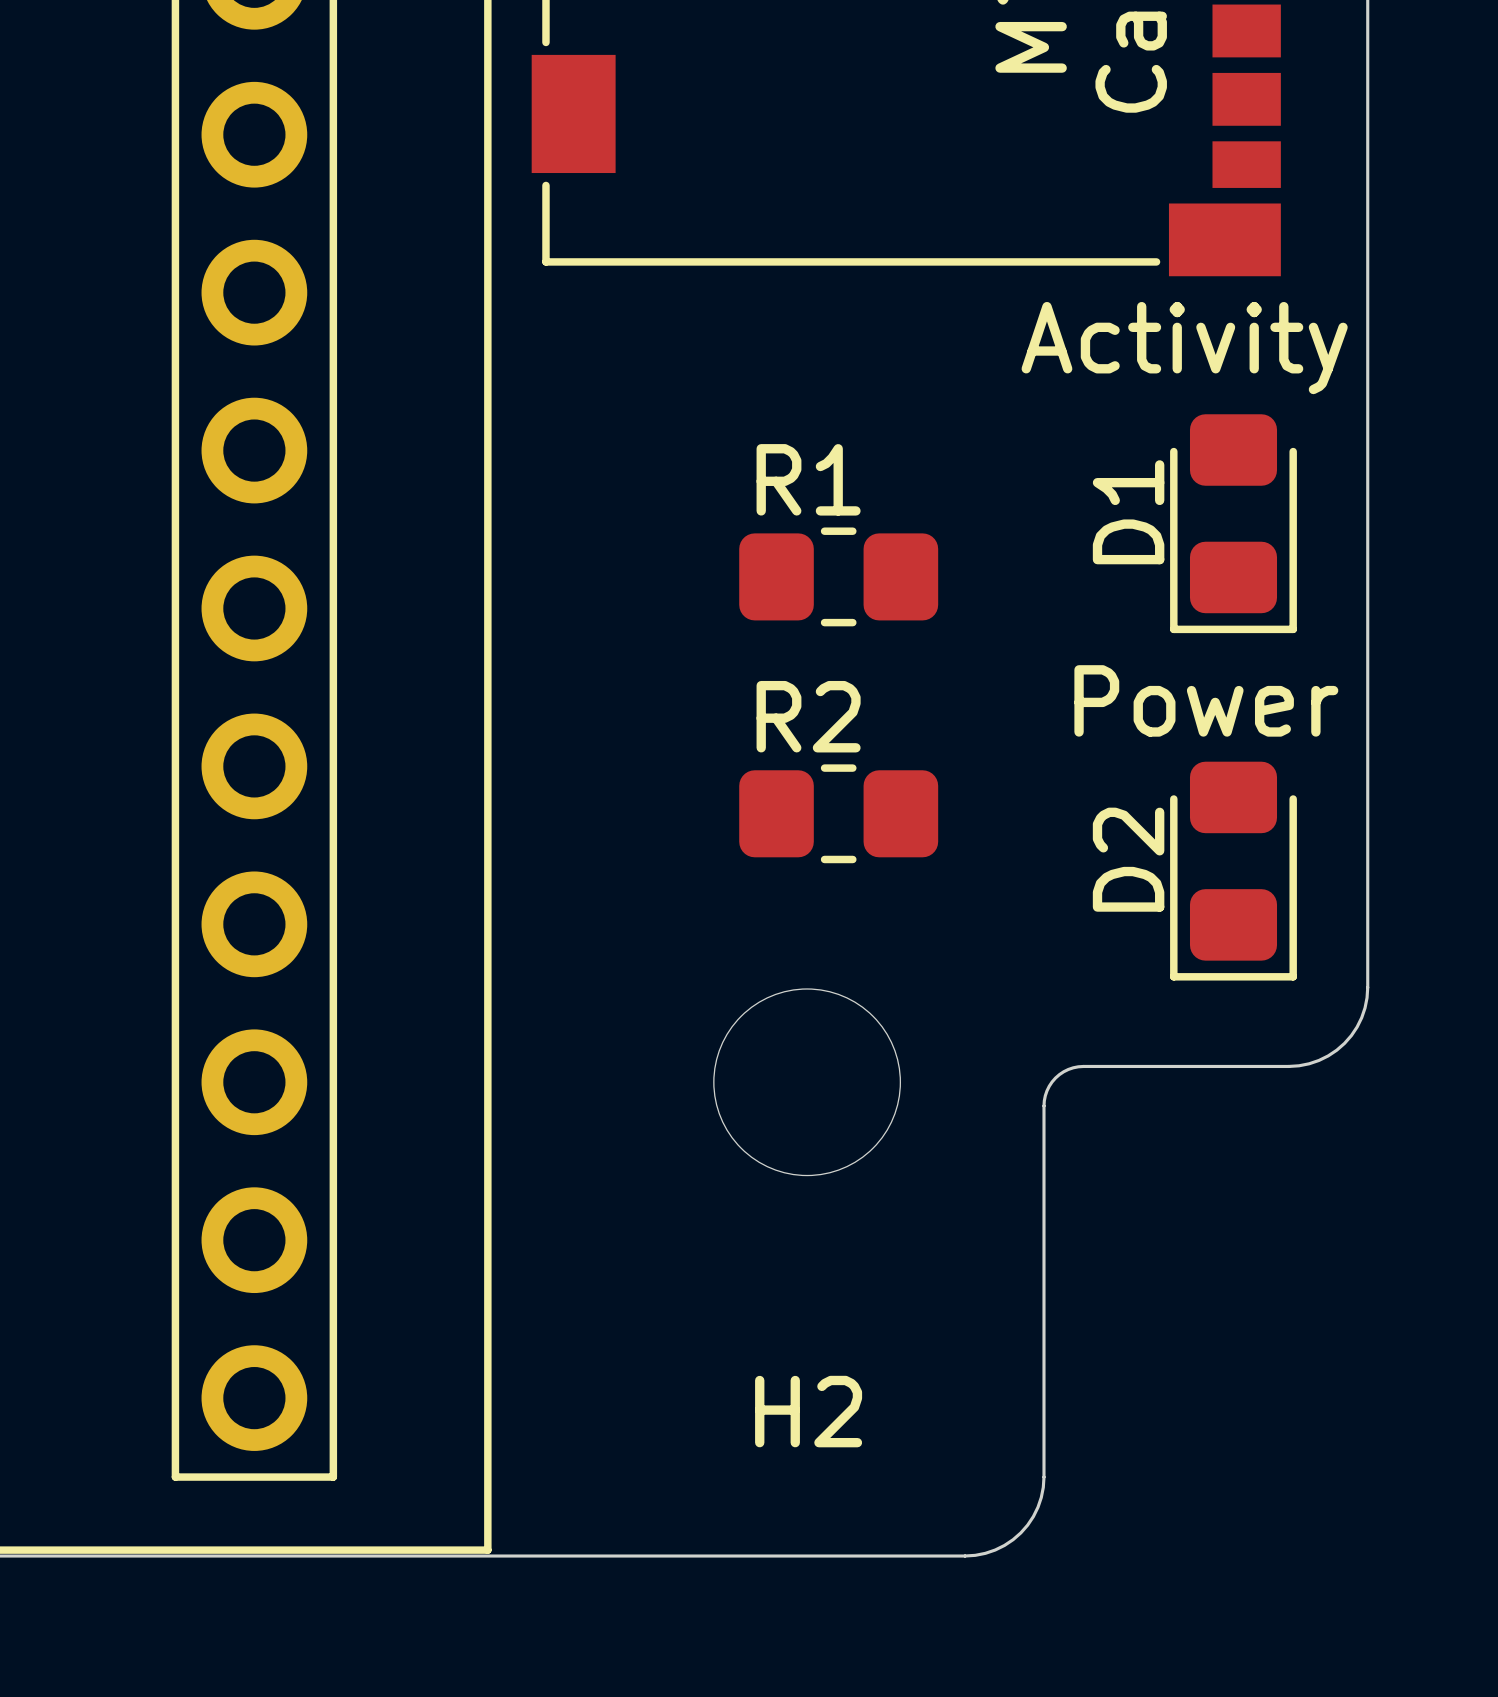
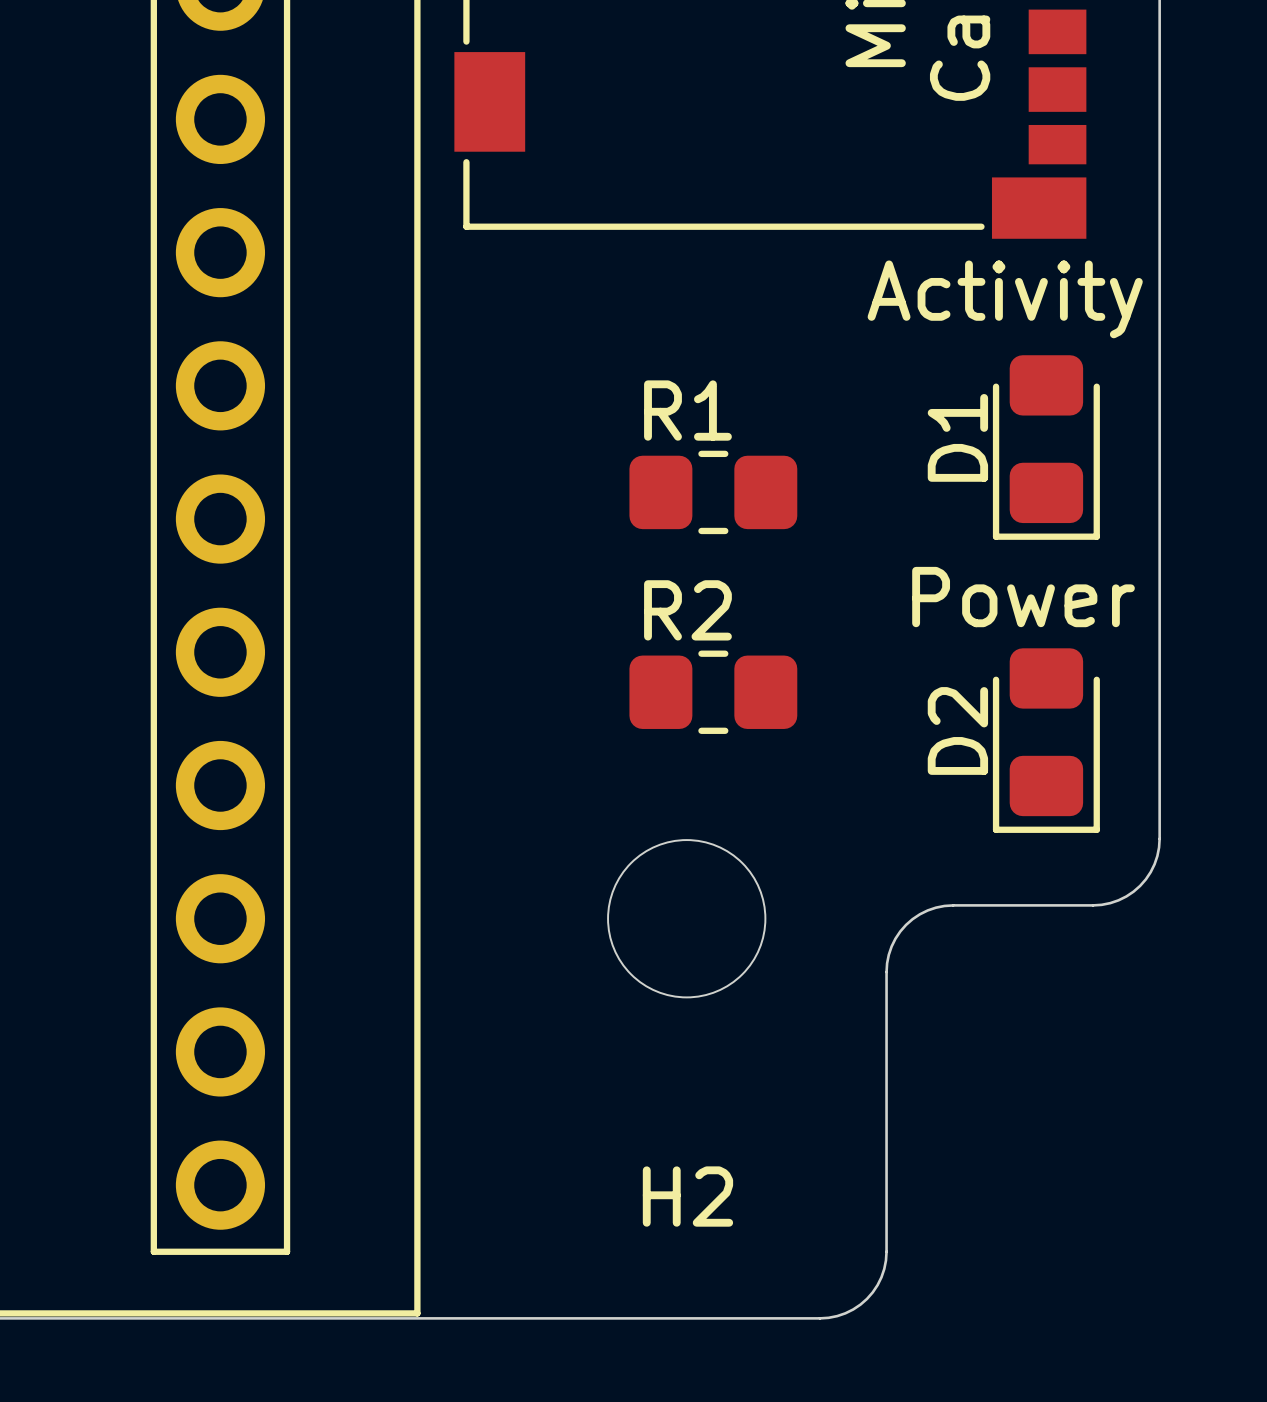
board edge: (1122, 1066) (1078, 1066) (1068, 1069) (1055, 1078) (1046, 1090) (1044, 1100) (1043, 1145) -> (953, 905) (927, 910) (906, 924) (891, 946) (886, 972)

